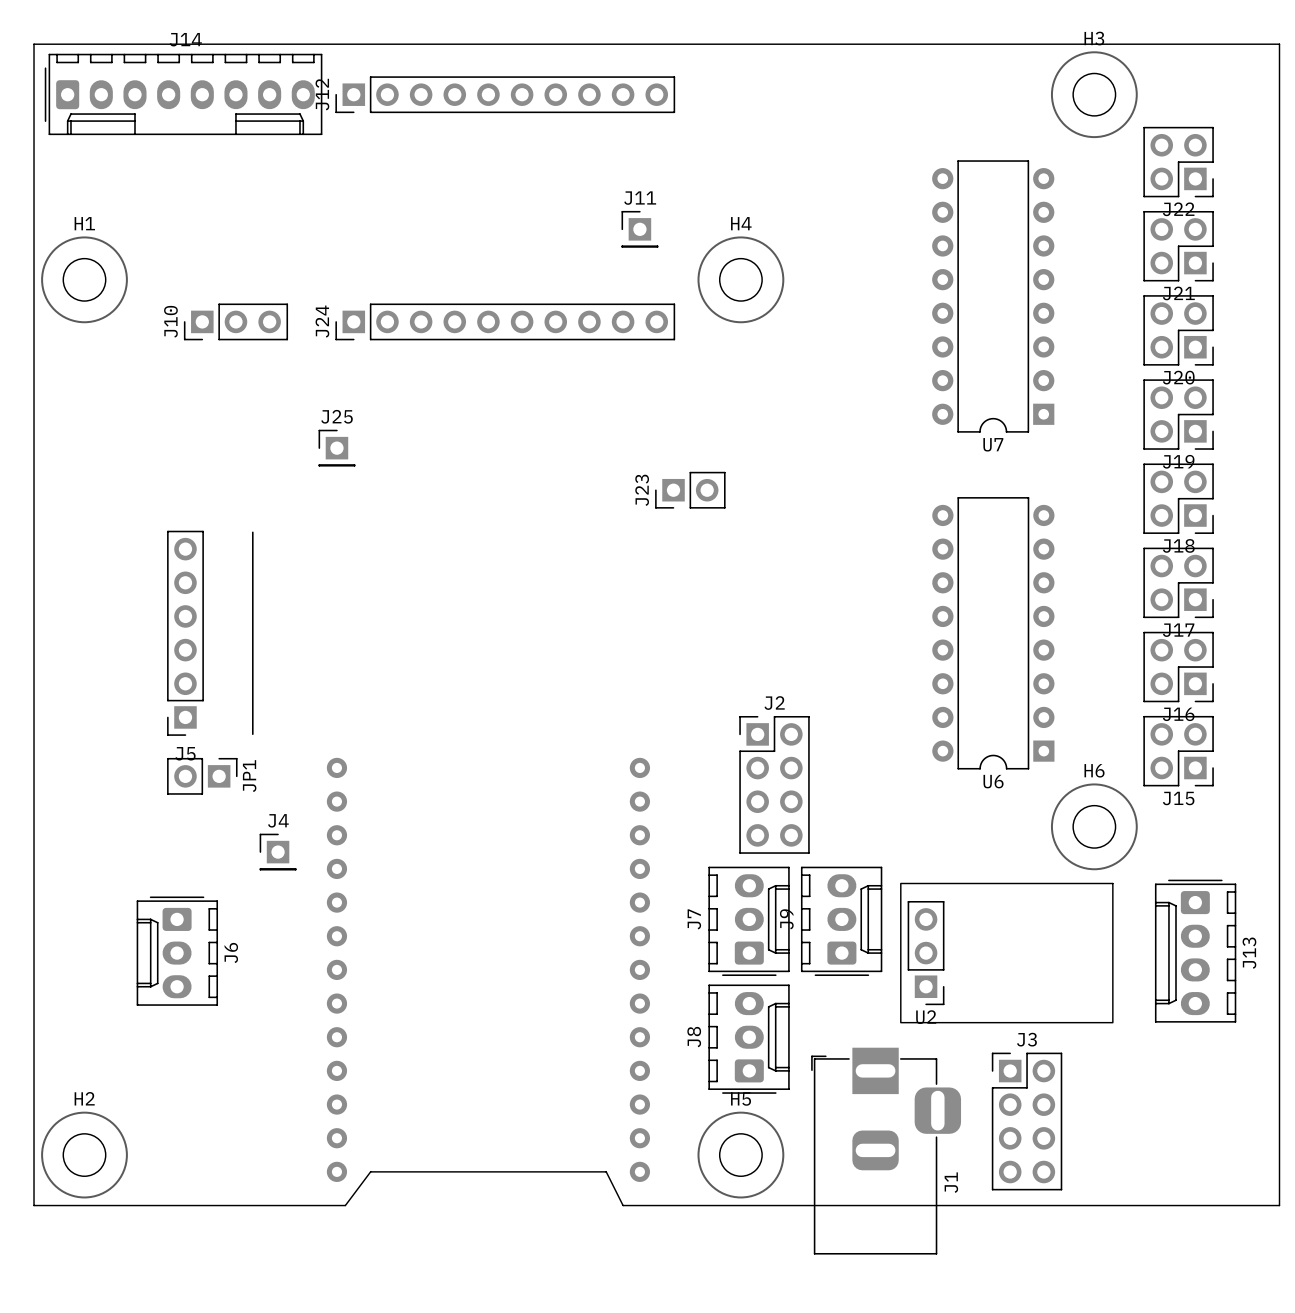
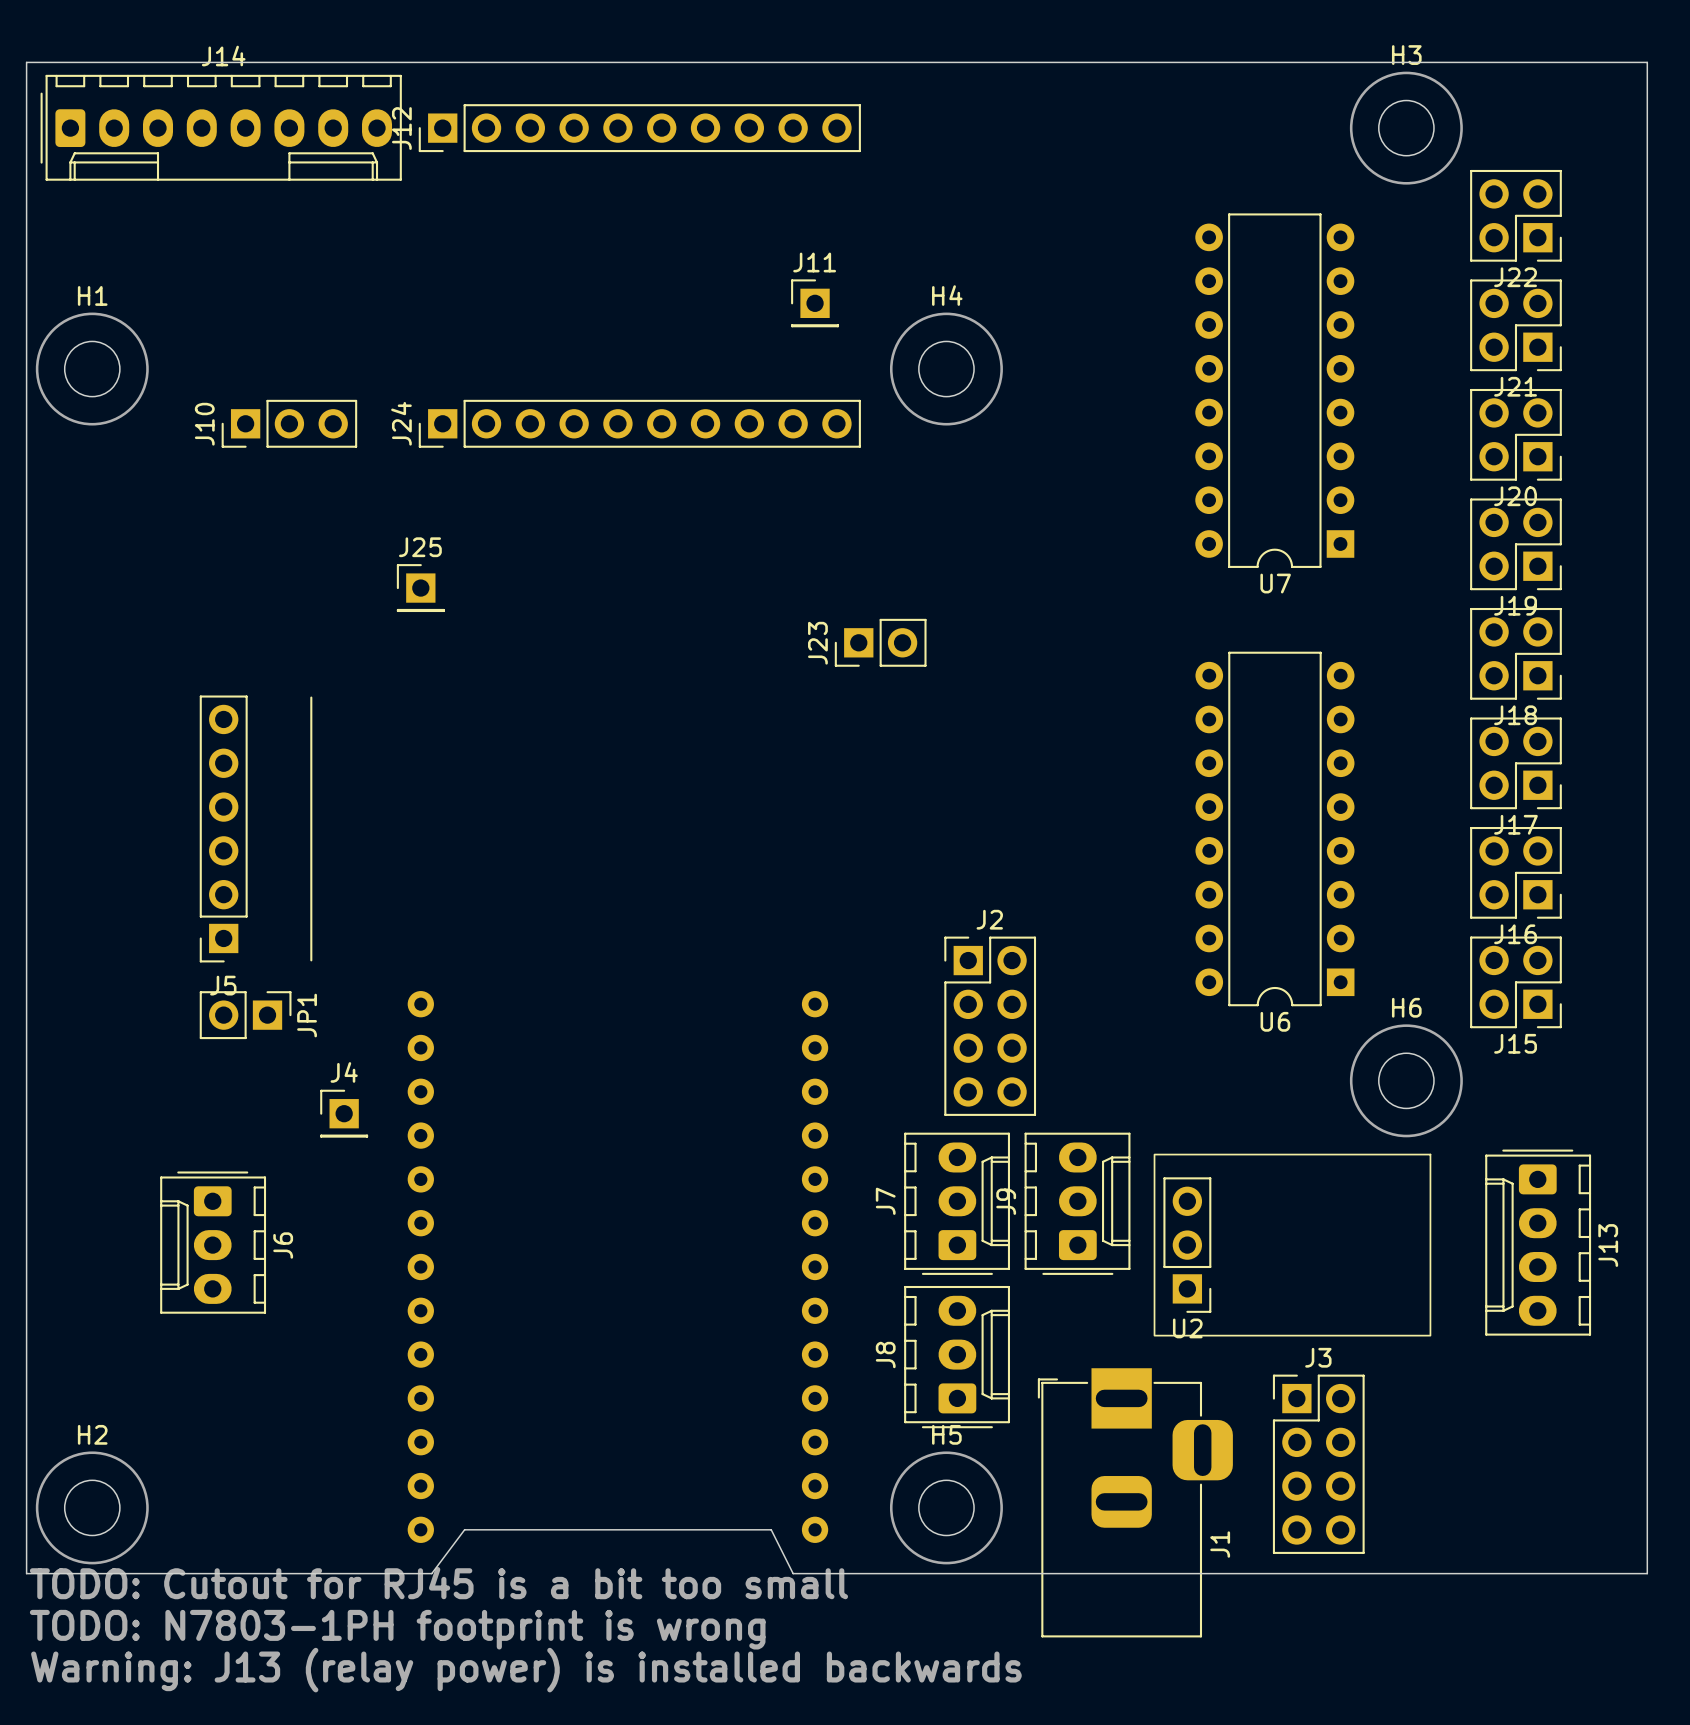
text: none -> TODO: Cutout for RJ45 is a bit too small (438, 1583)
text: none -> TODO: N7803-1PH footprint is wrong (397, 1629)
text: none -> Warning: J13 (relay power) is installed backwards (526, 1670)

